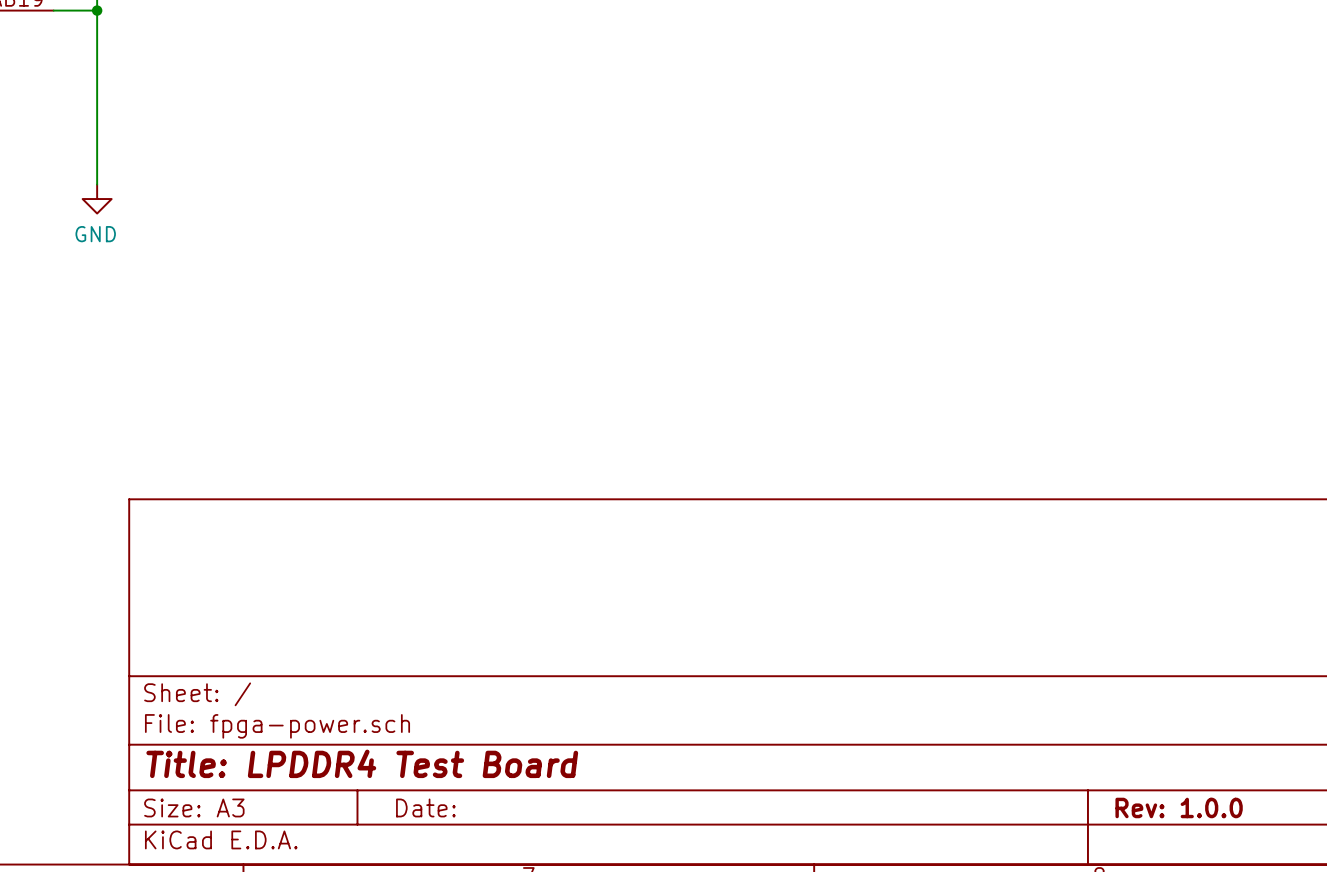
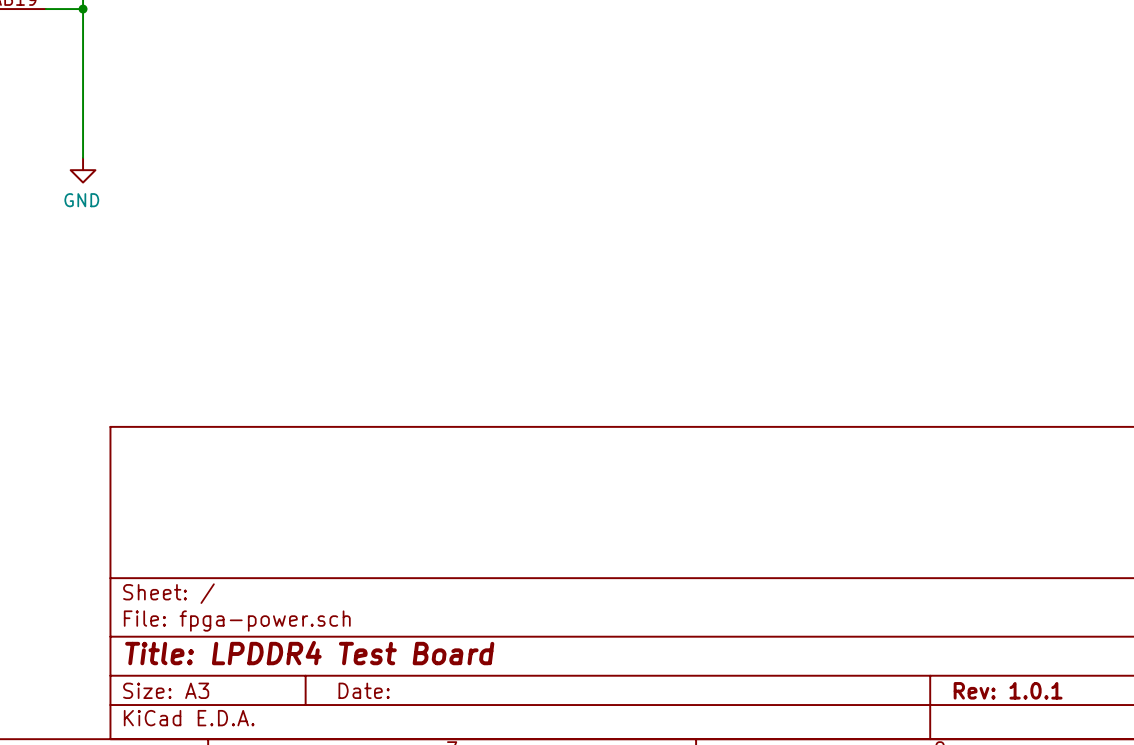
title block: Rev: 1.0.0 (1179, 807) -> Rev: 1.0.1 (1008, 690)

